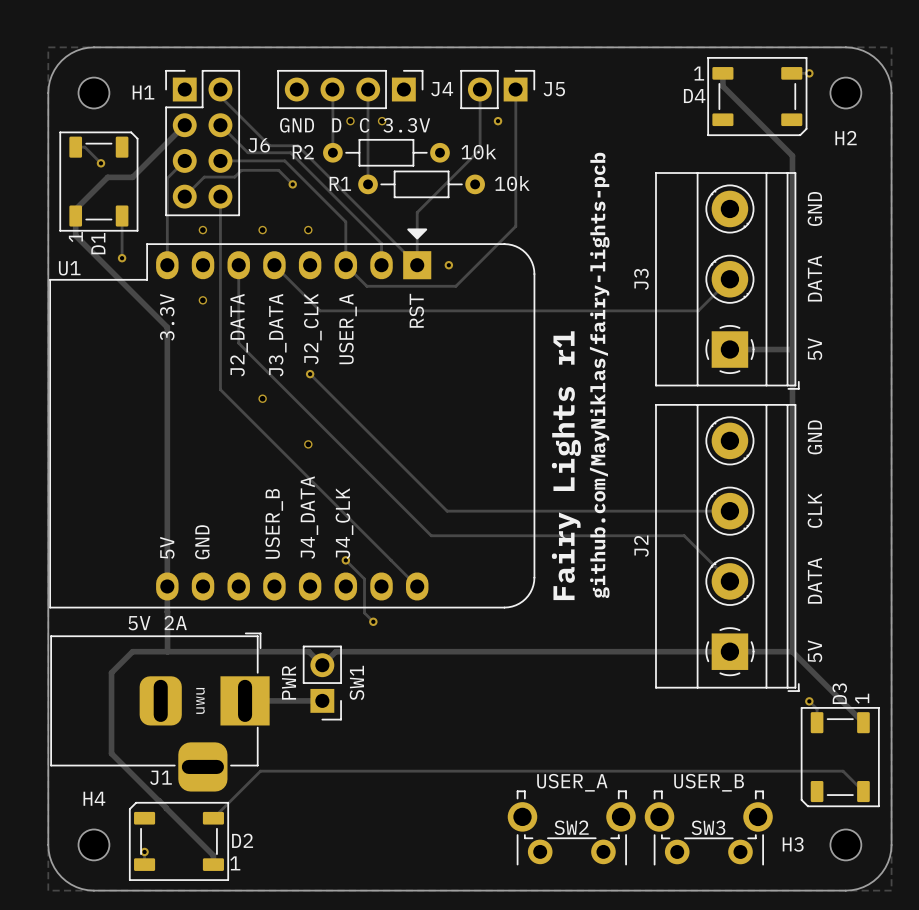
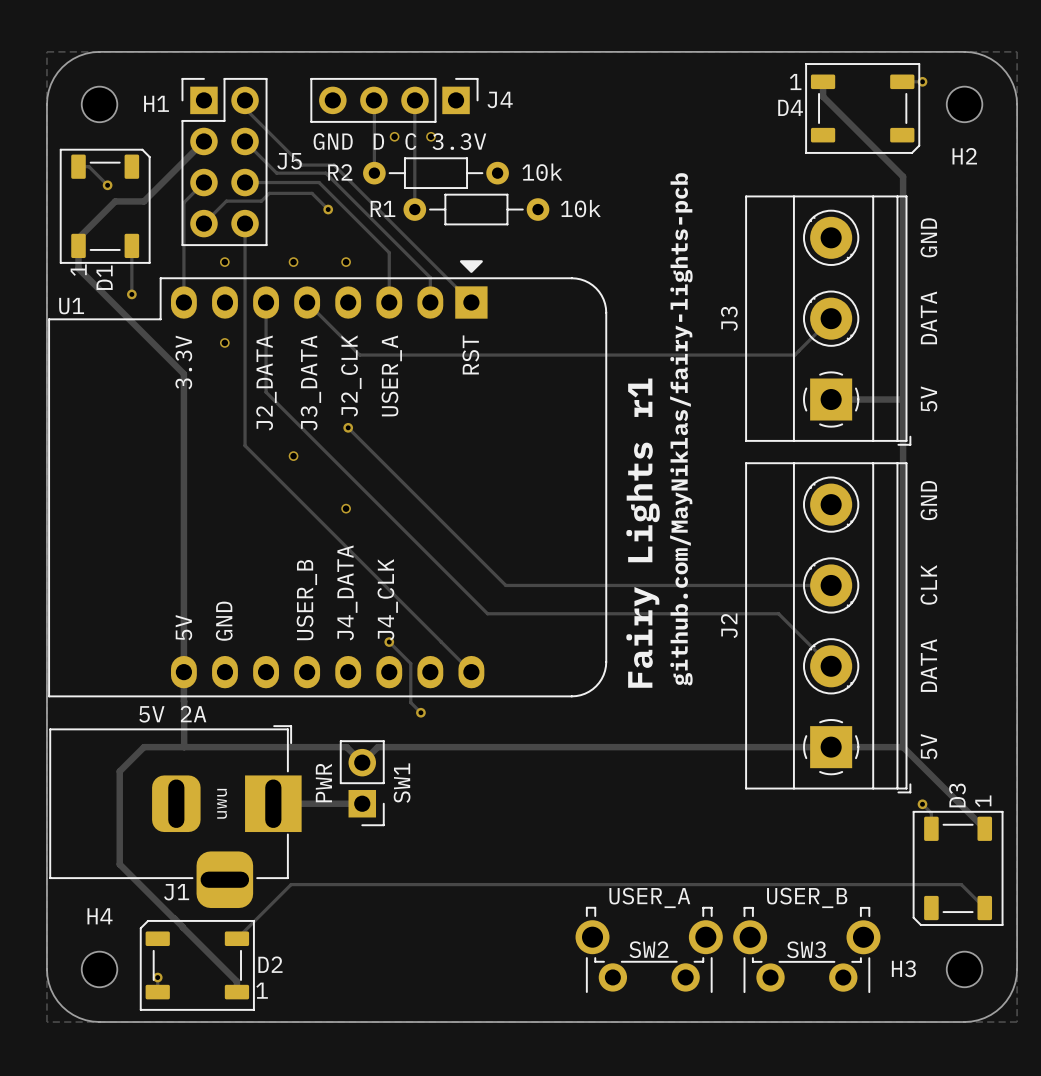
track: (480, 89) (480, 149) (417, 212) (417, 265) -> none
J5: (497, 89) -> none
track: (515, 89) (515, 226) (455, 286) (366, 286) (345, 265) -> none
via: (498, 121) -> none
J6 name: J6 (259, 145) -> J5 (289, 161)
via: (448, 265) -> none

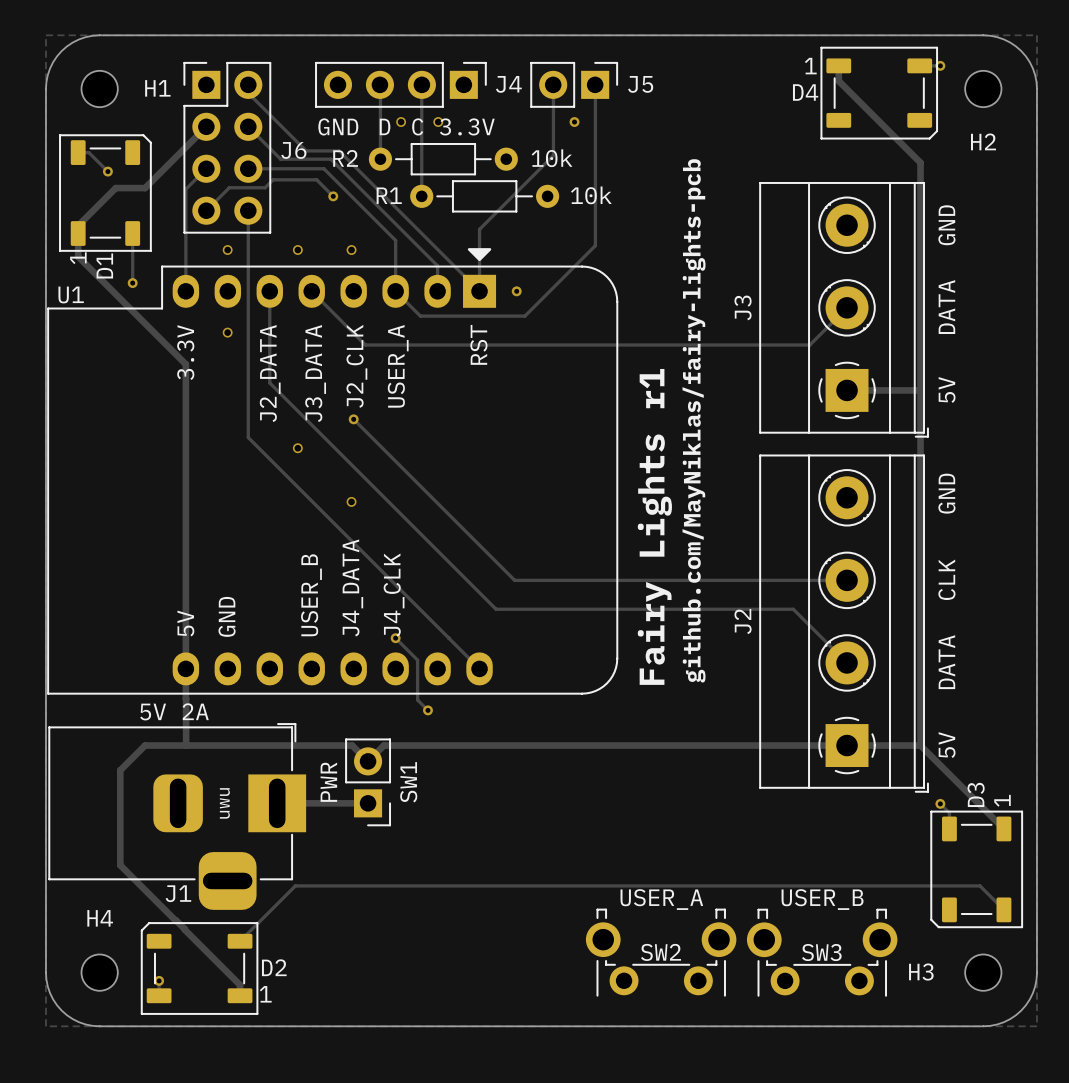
track: none -> (553, 84) (553, 155) (479, 229) (479, 291)
J5: none -> (574, 84)
track: none -> (595, 84) (595, 245) (524, 316) (420, 316) (395, 291)
via: none -> (574, 122)
J5 name: J5 (289, 161) -> J6 (293, 150)
via: none -> (516, 291)

